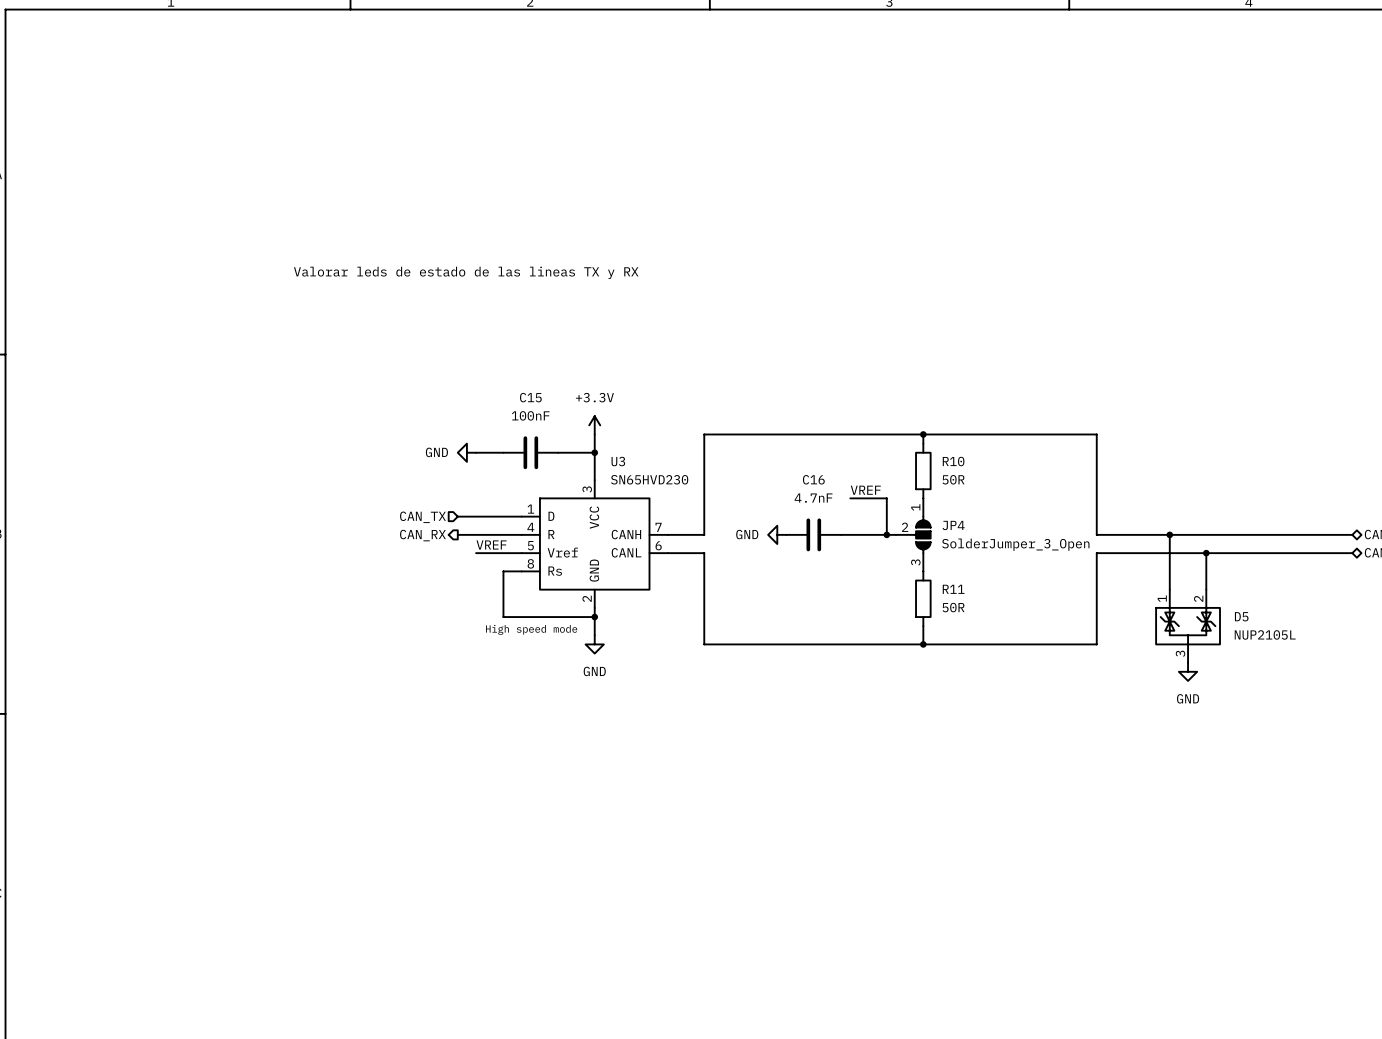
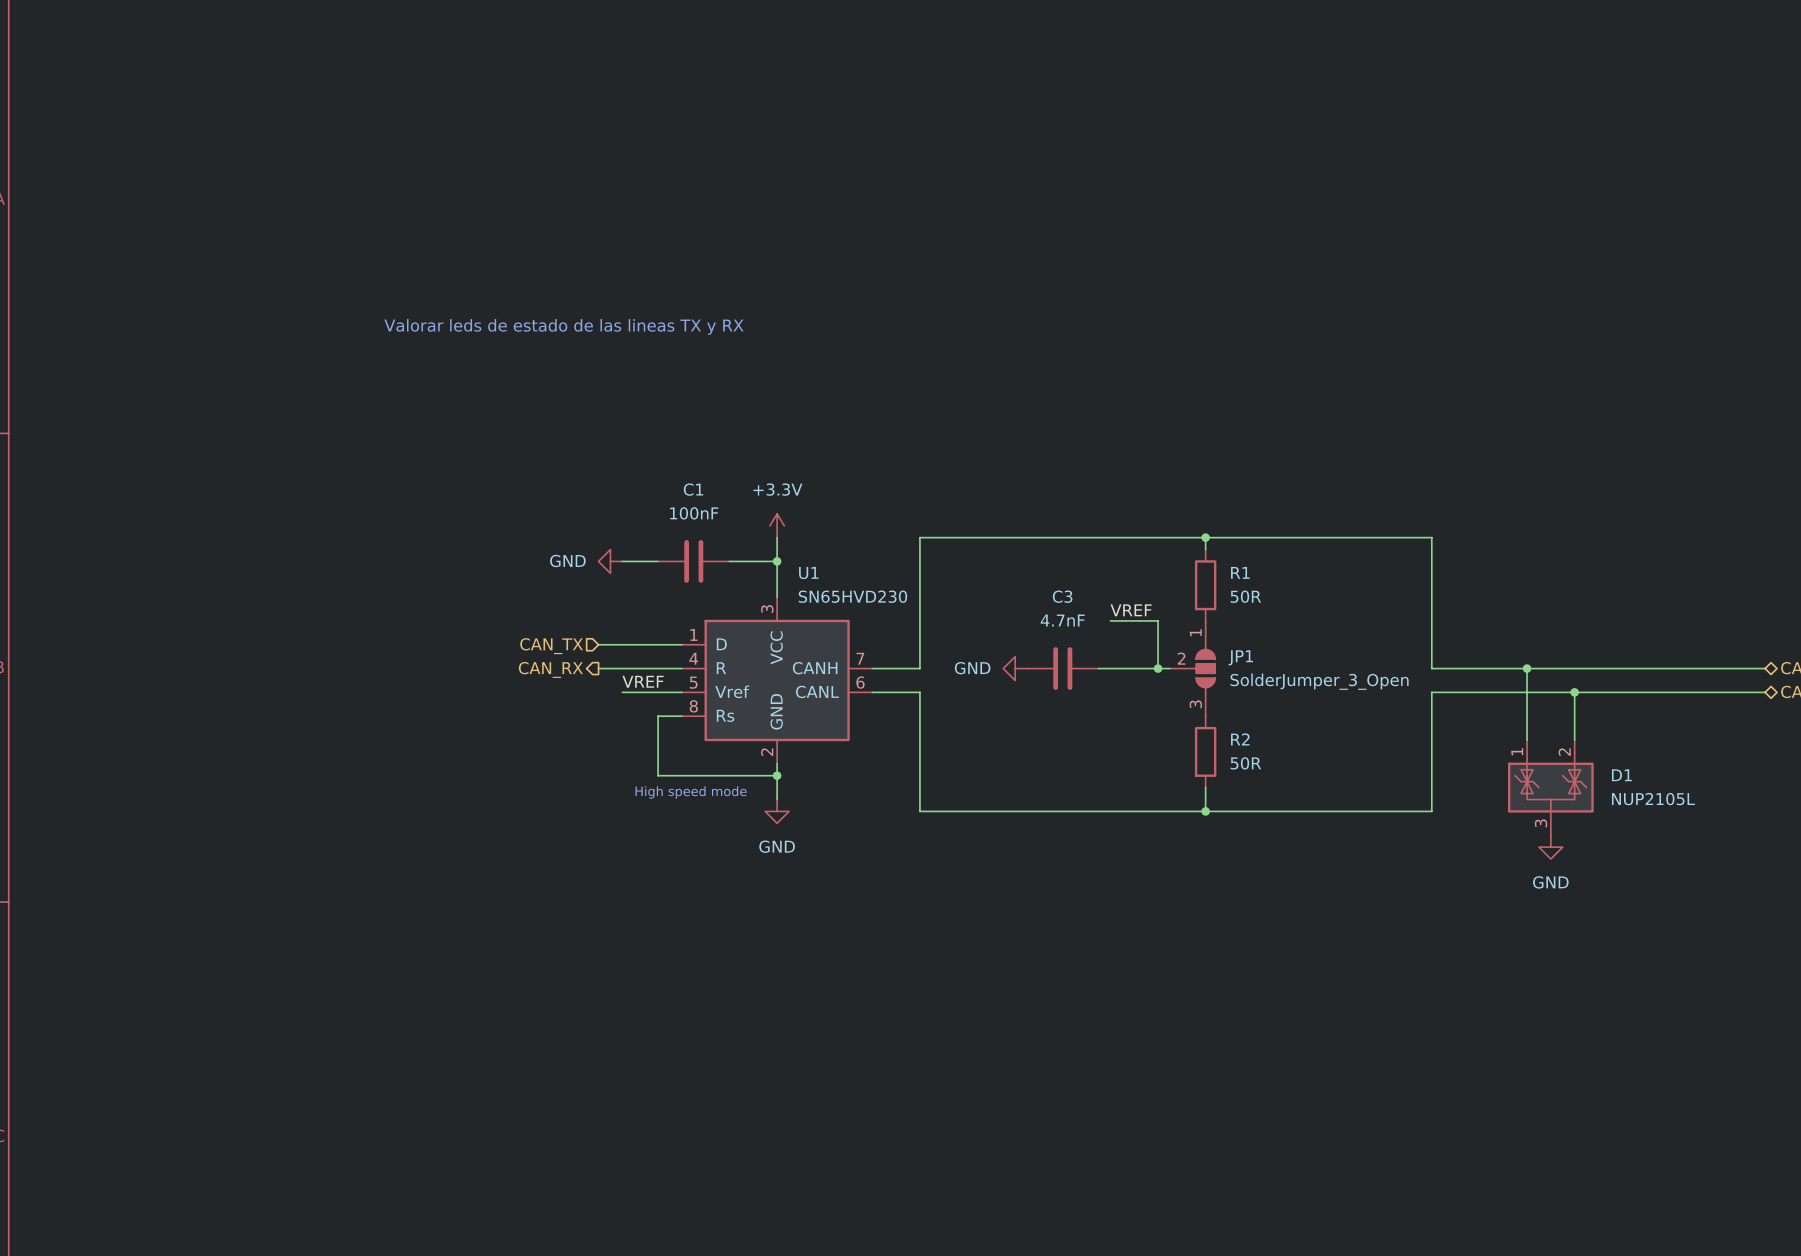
C15 name: C15 (530, 397) -> C1 (693, 489)
U3 name: U3 (618, 461) -> U1 (808, 573)
R10 name: R10 (953, 461) -> R1 (1240, 572)
C16 name: C16 (813, 479) -> C3 (1062, 596)
JP4 name: JP4 (953, 525) -> JP1 (1240, 657)
R11 name: R11 (953, 589) -> R2 (1240, 739)
D5 name: D5 (1241, 616) -> D1 (1621, 775)

